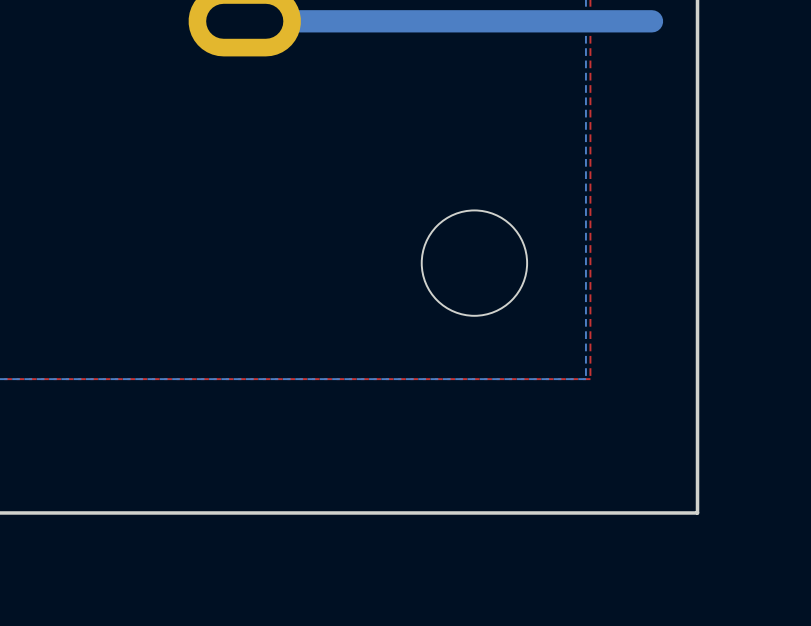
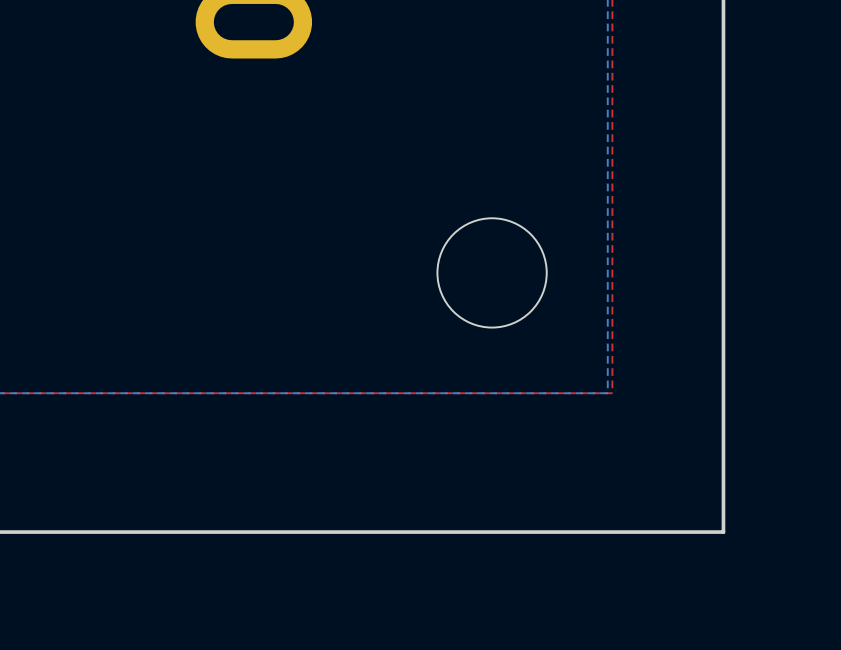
bottom track: (652, 21) (244, 21) -> none

